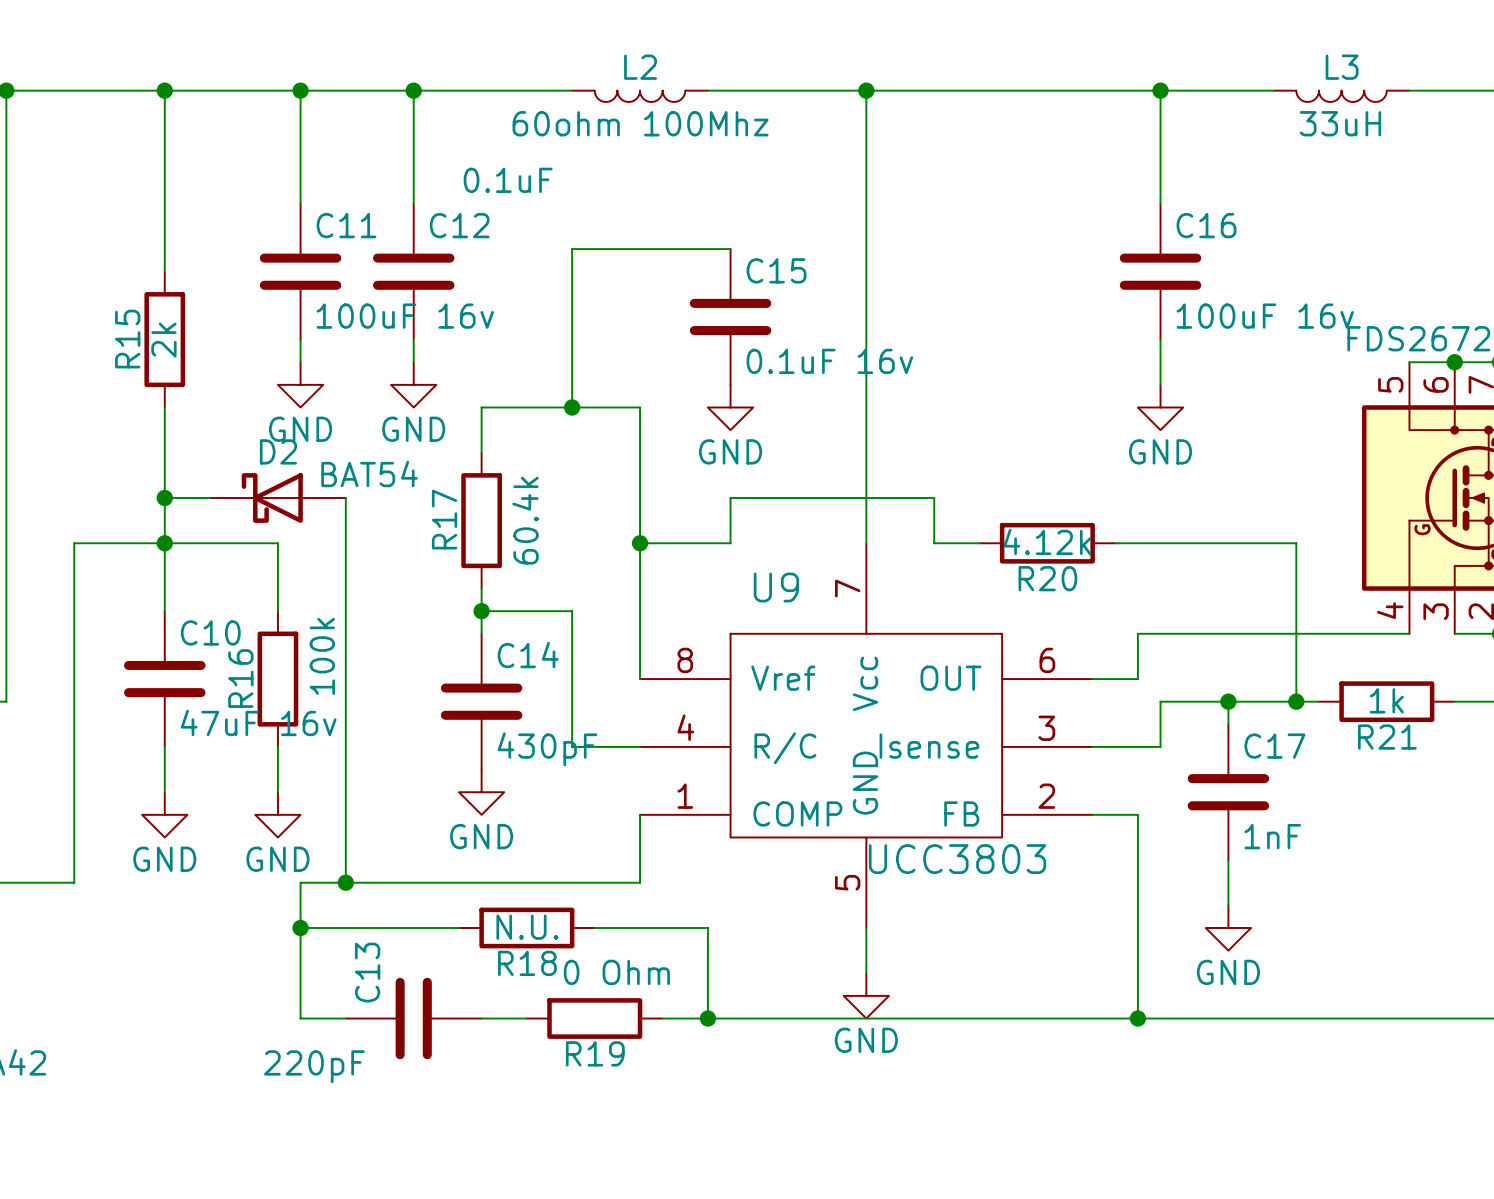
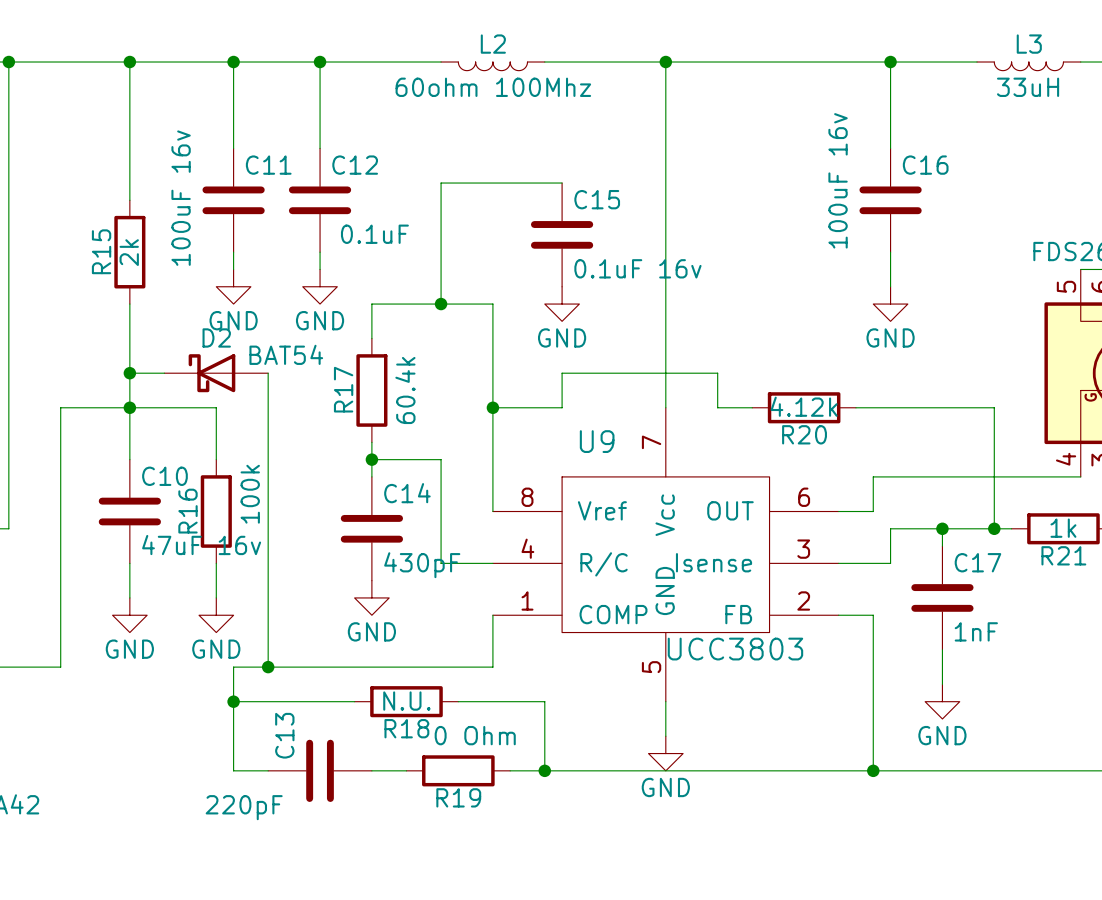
C12 value position: 0.1uF (508, 180) -> 0.1uF (374, 234)
C11 value rotation: 0° (405, 316) -> 90° counterclockwise (181, 198)
C16 value rotation: 0° (1265, 316) -> 90° counterclockwise (838, 180)

